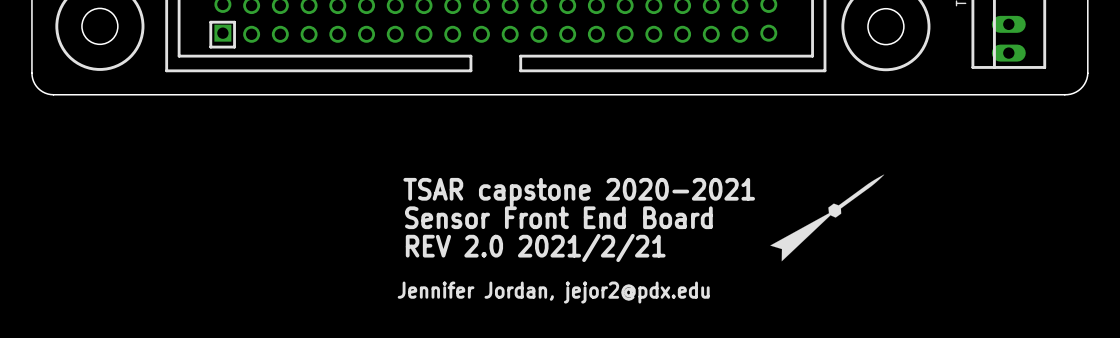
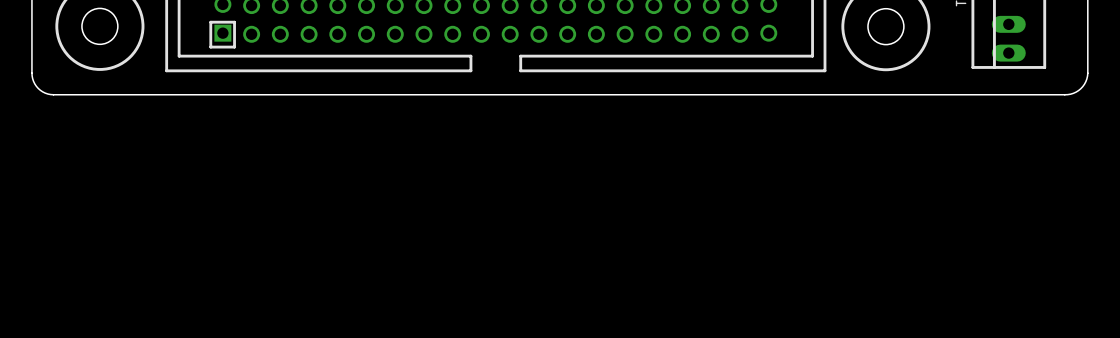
drawing: [770, 174, 885, 262] -> none
text: TSAR capstone 2020-2021 (579, 192) -> none
text: Sensor Front End Board (558, 217) -> none
text: REV 2.0 2021/2/21 (535, 247) -> none
text: Jennifer Jordan, jejor2@pdx.edu (553, 292) -> none

